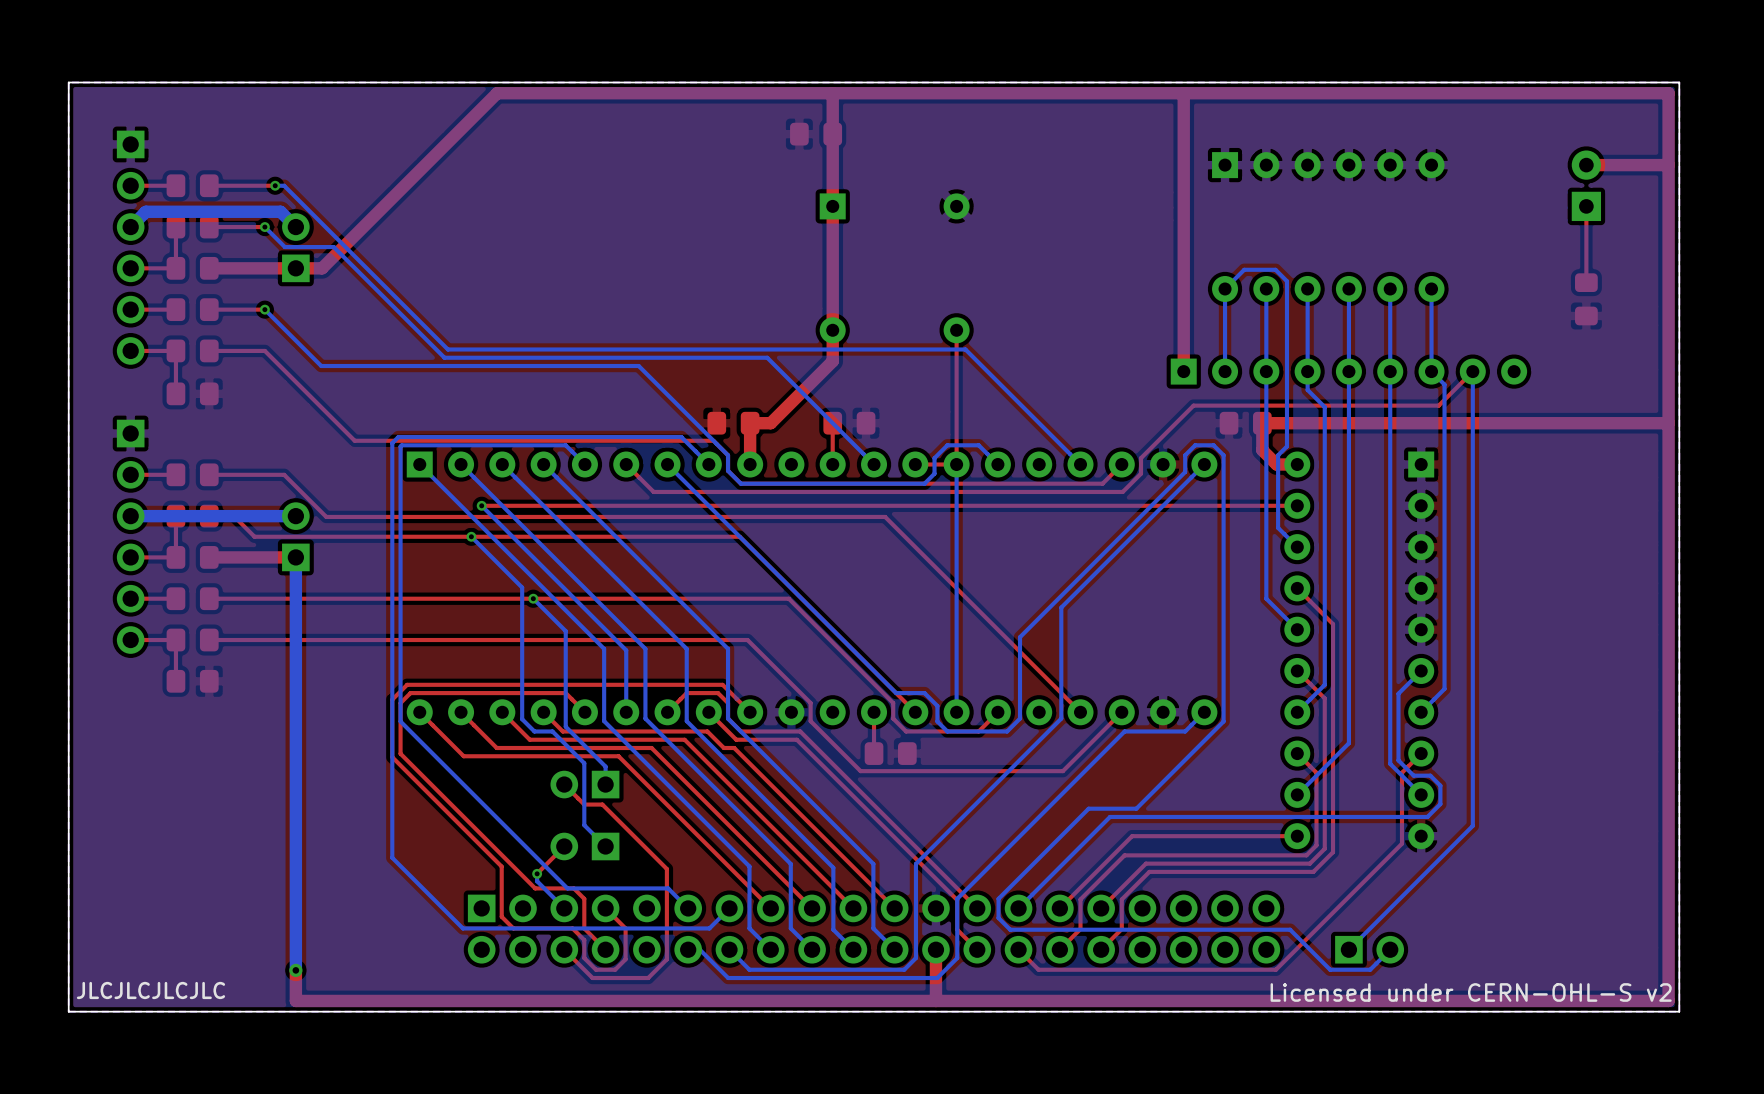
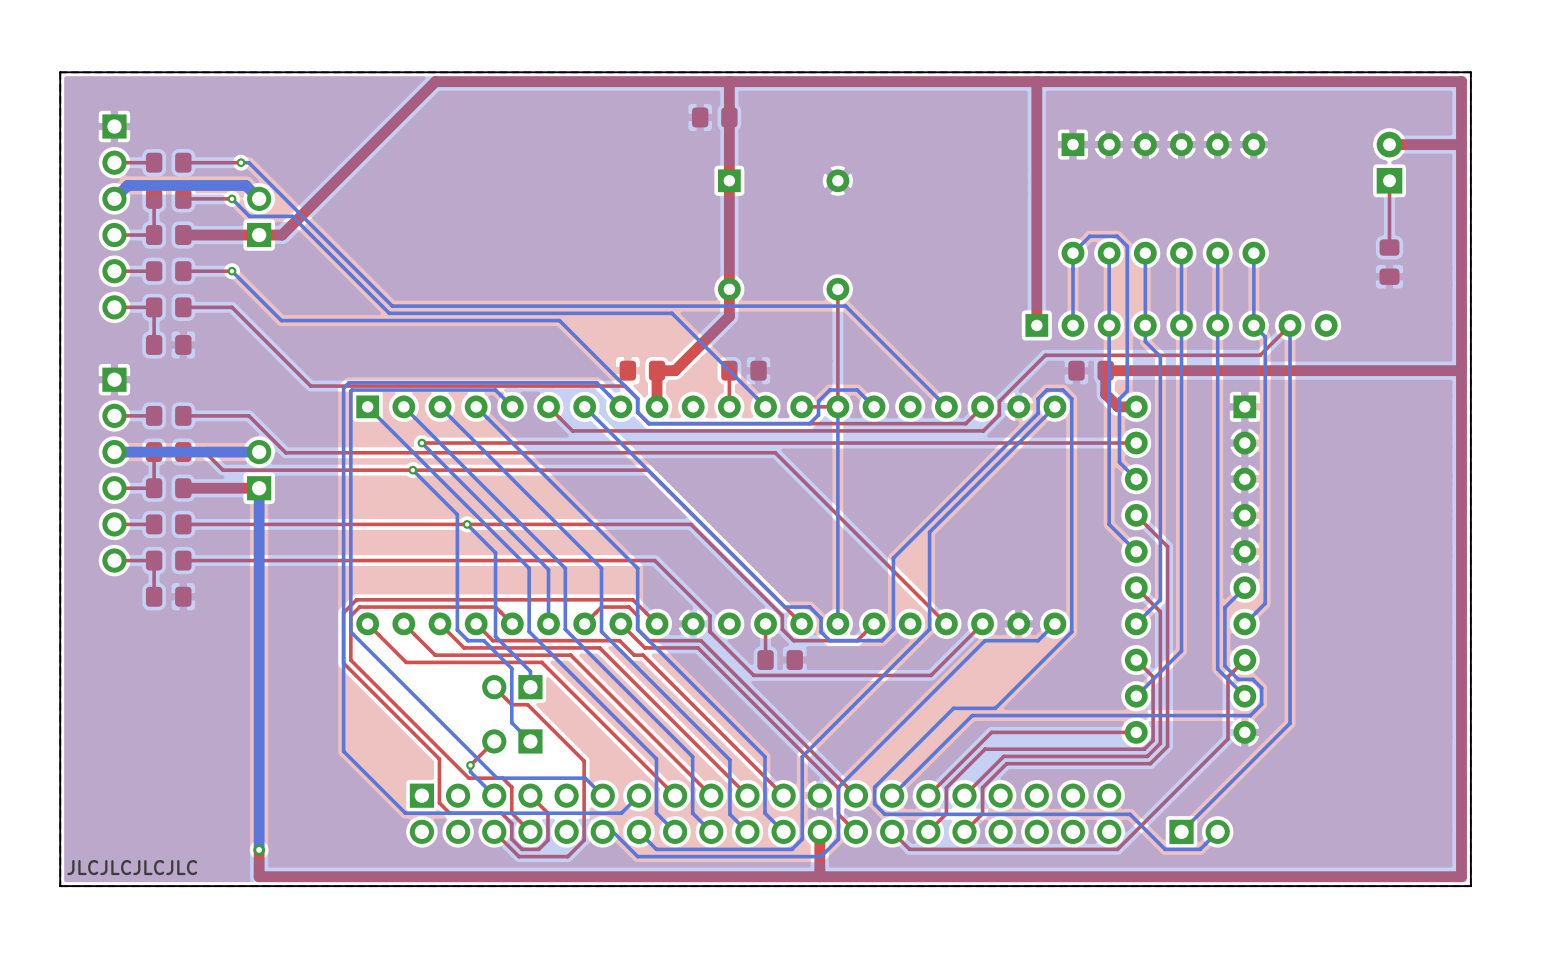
text: Licensed under CERN-OHL-S v2 (1471, 992) -> none

